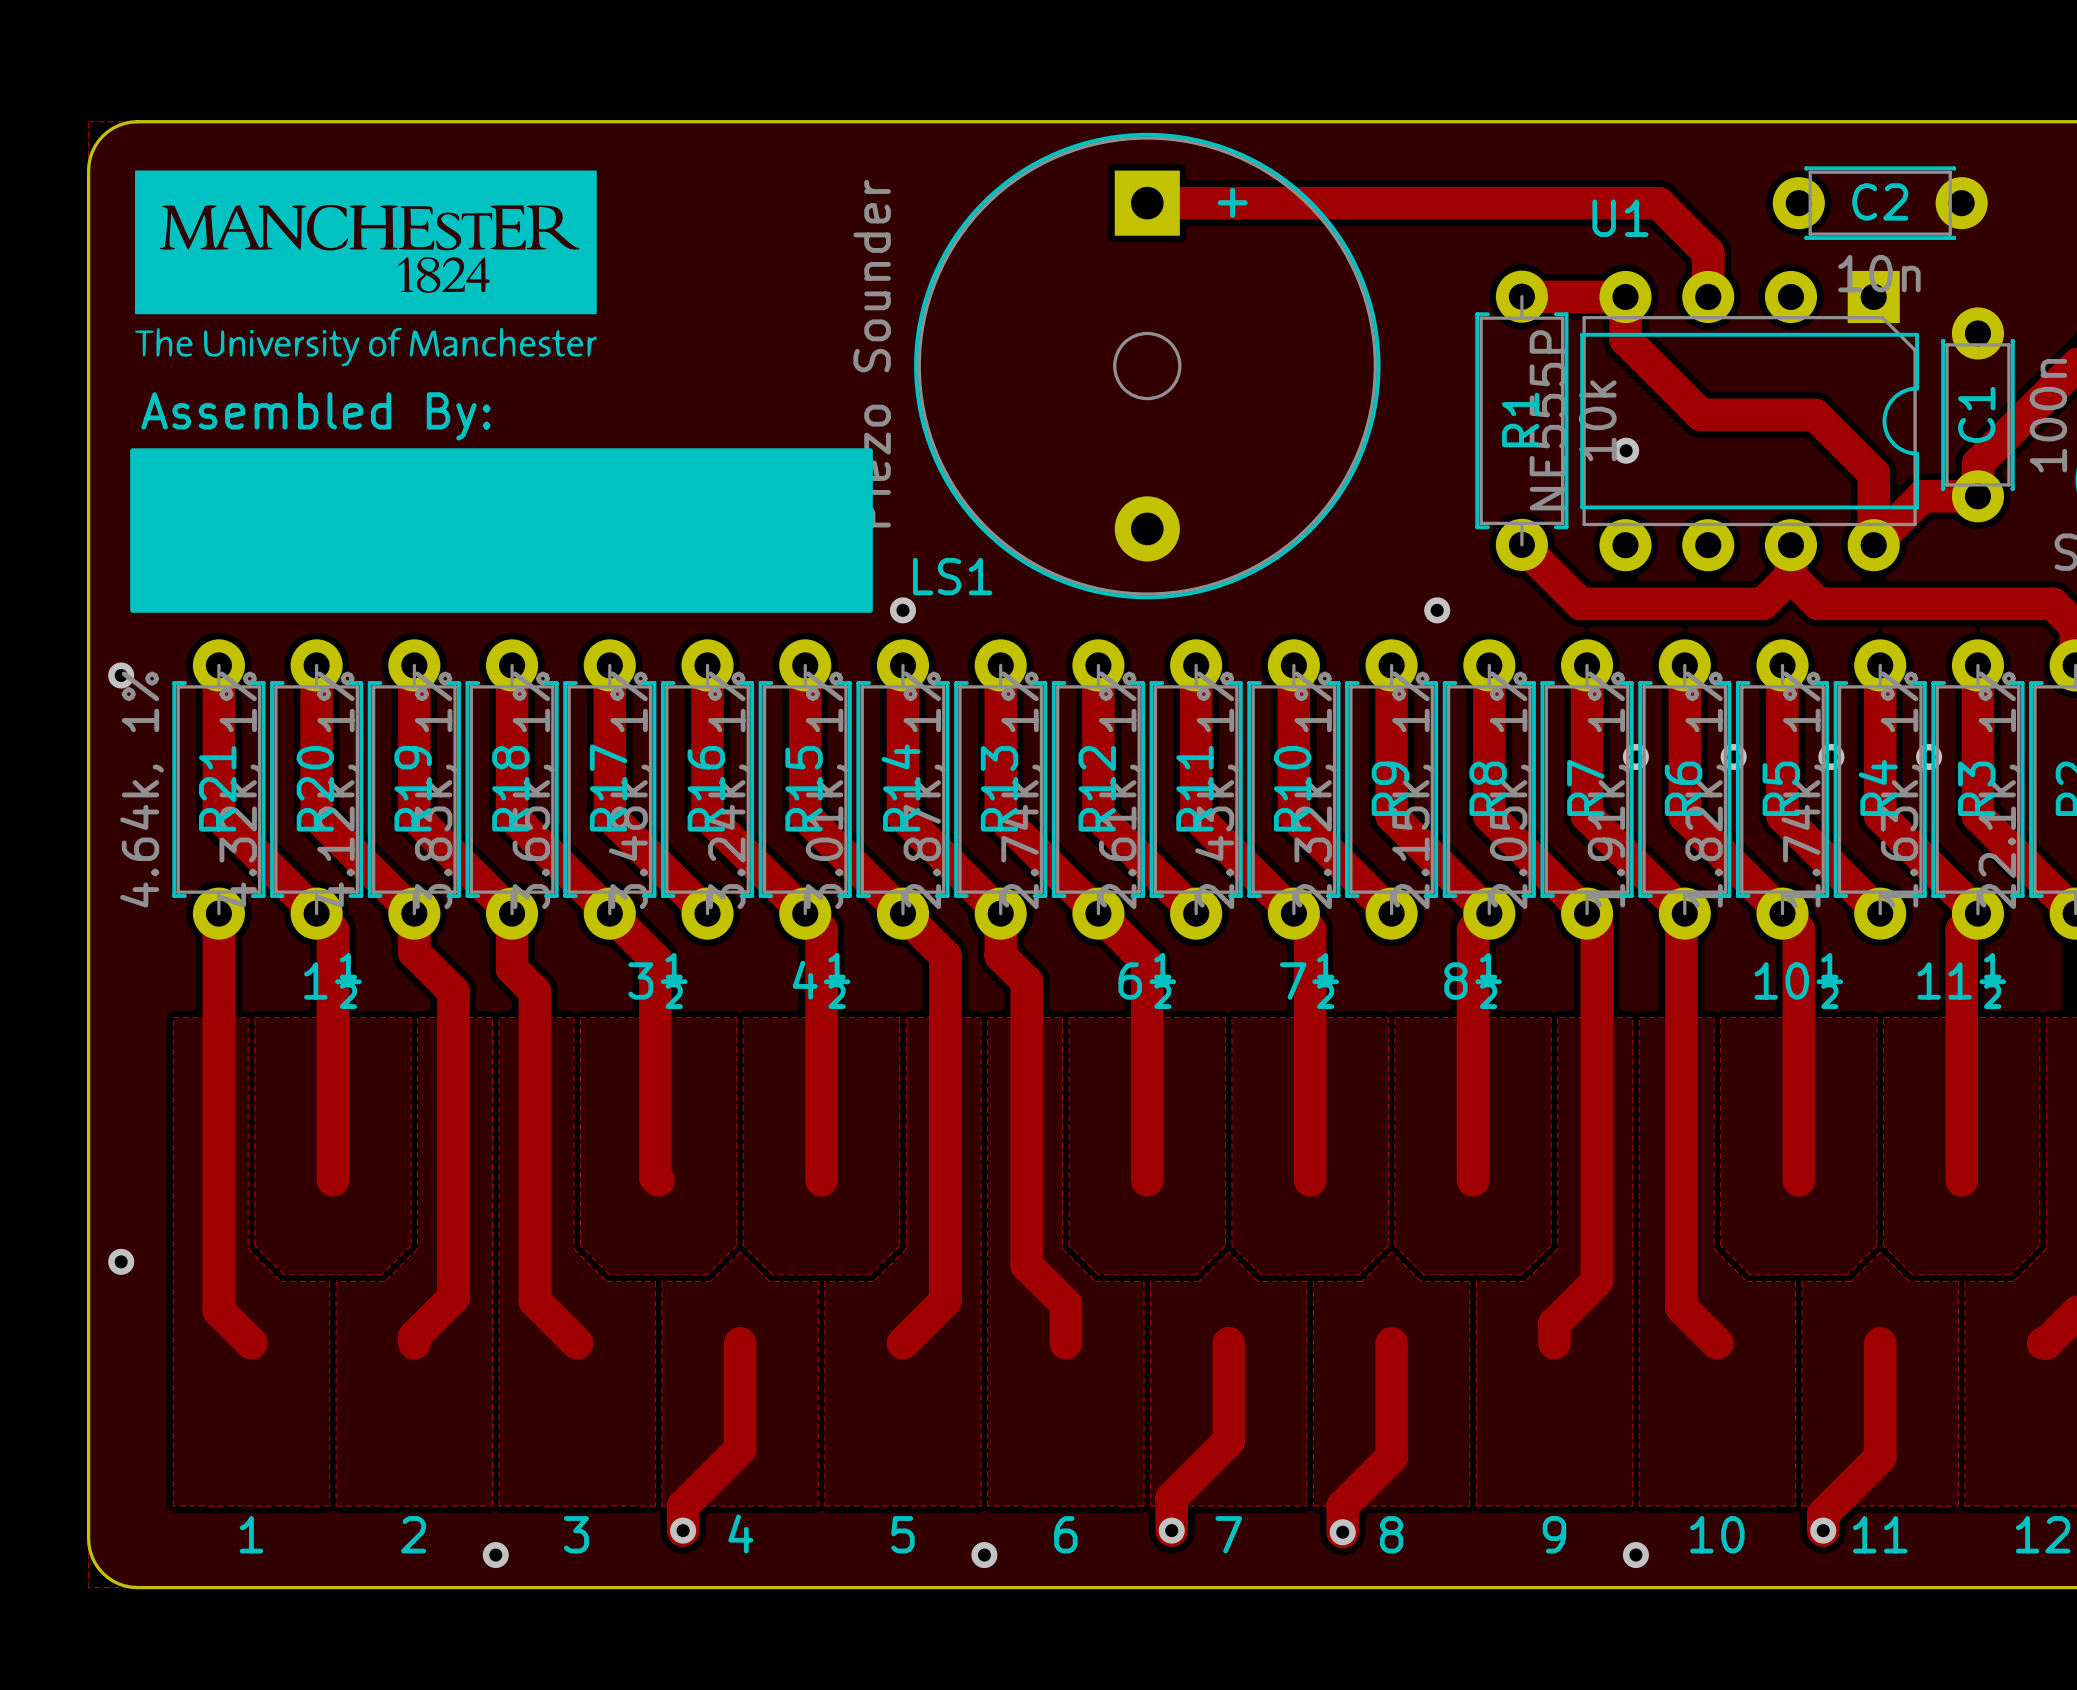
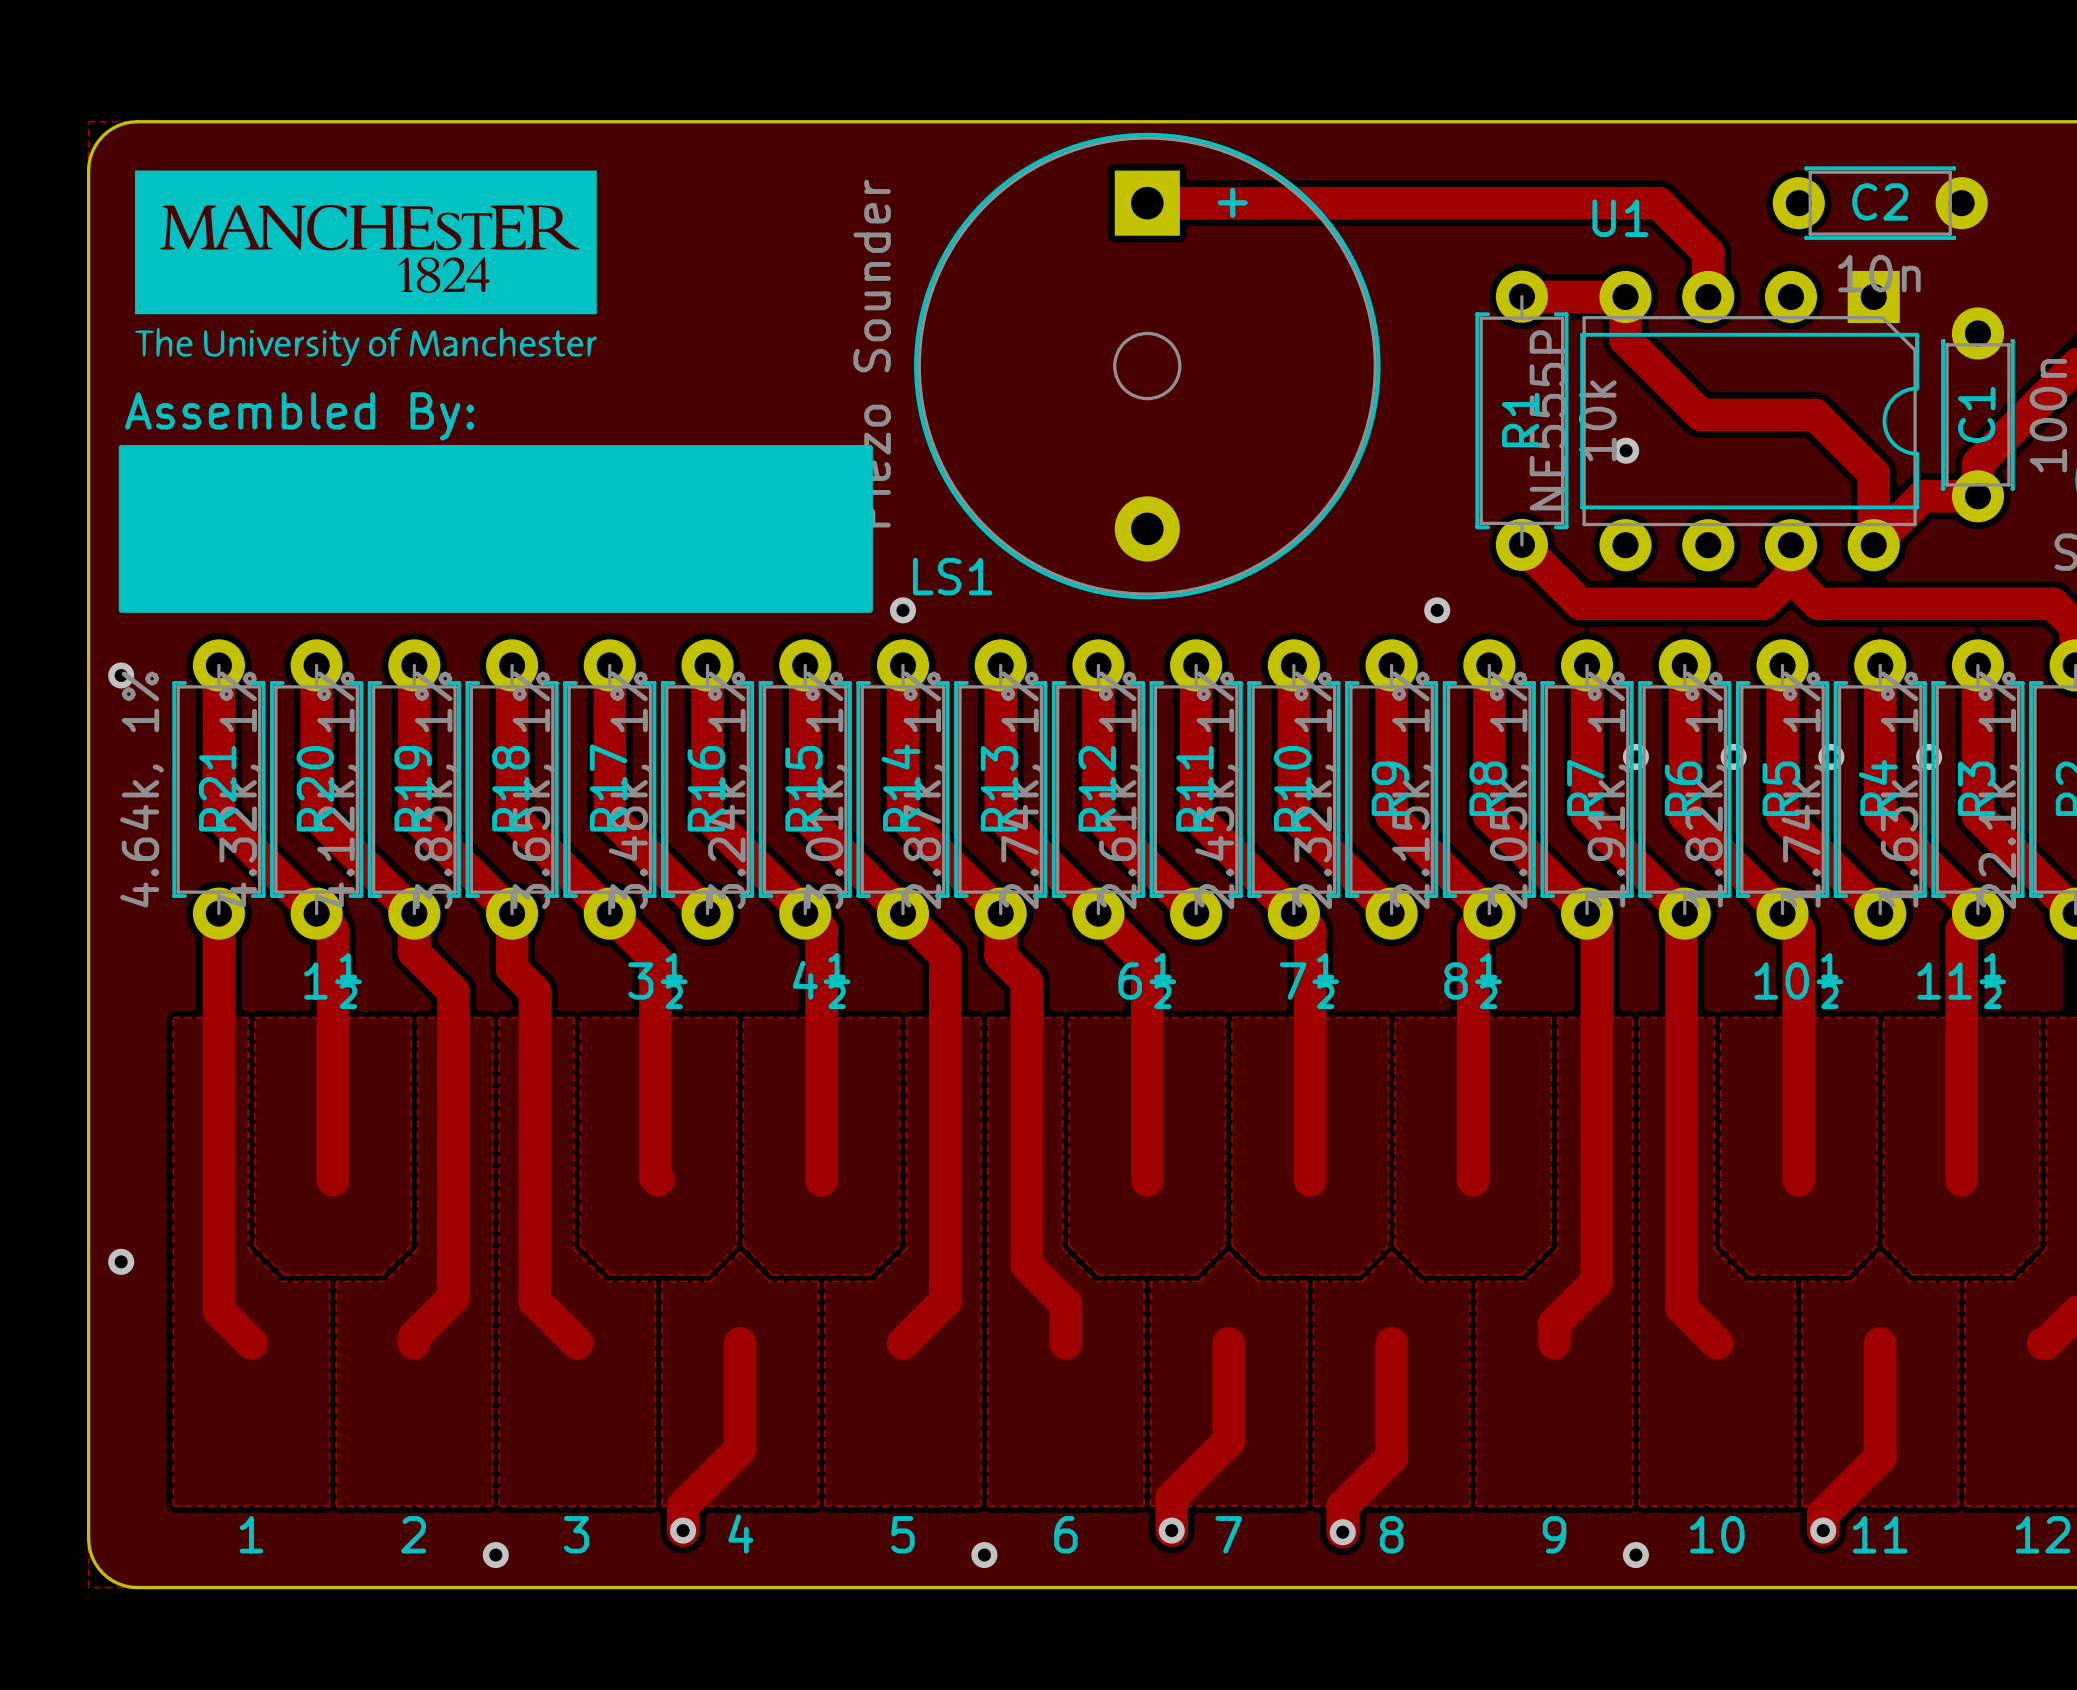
text position: Assembled By: (315, 416) -> Assembled By: (299, 416)
drawing shape: [130, 448, 873, 613] -> [118, 445, 873, 613]

